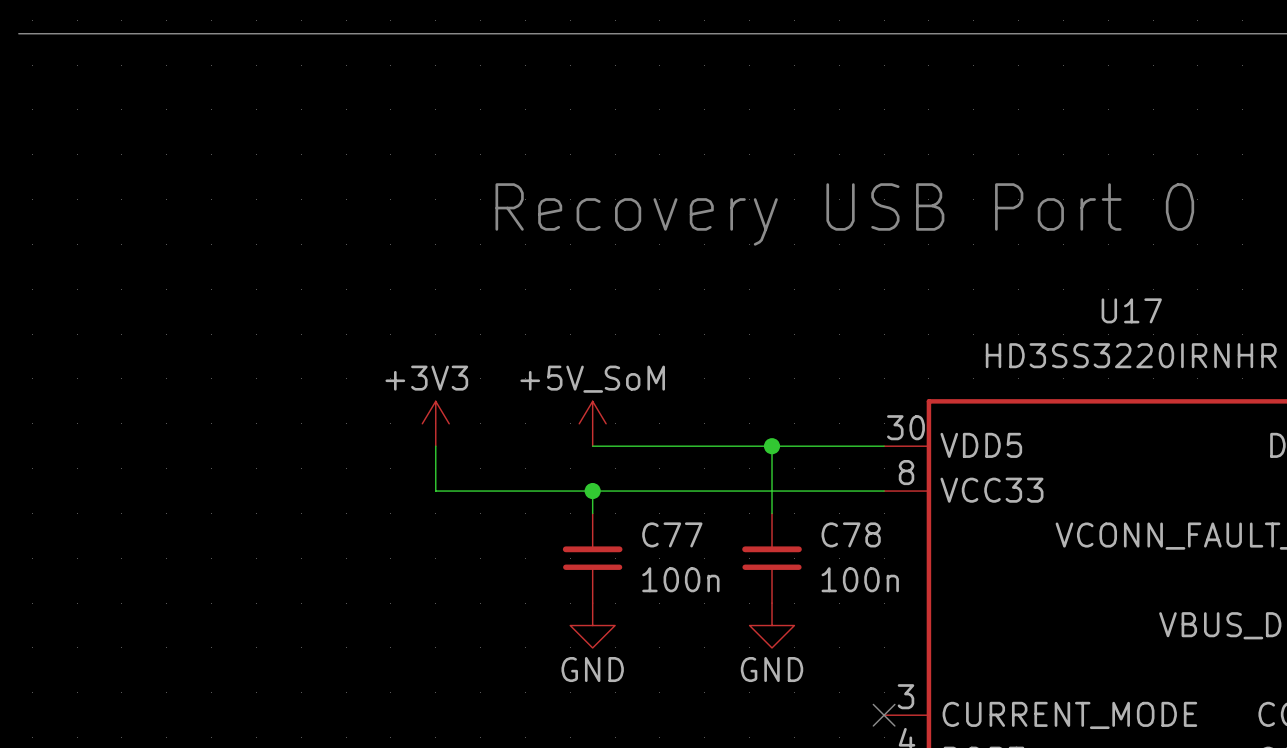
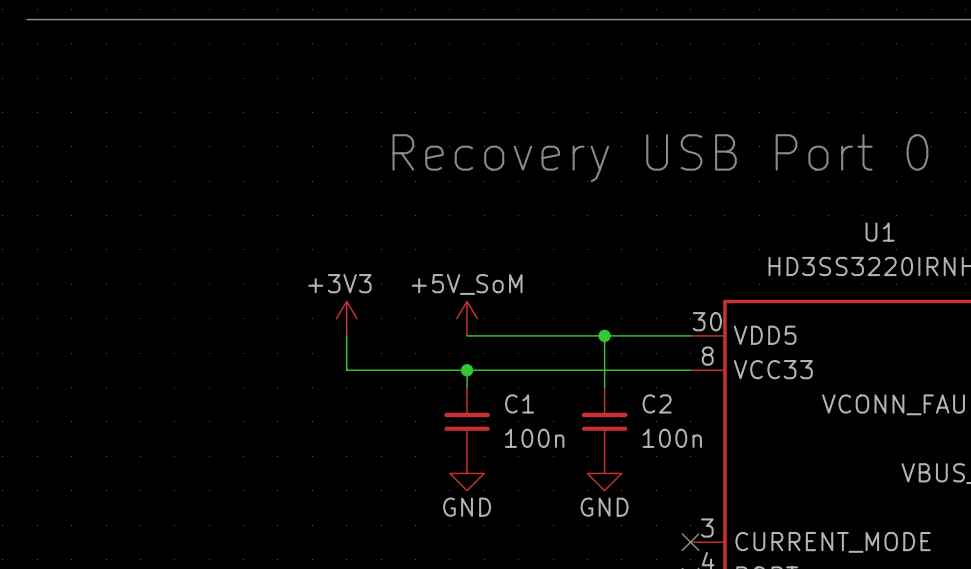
U17 name: U17 (1131, 310) -> U1 (880, 232)
C77 name: C77 (672, 534) -> C1 (519, 403)
C78 name: C78 (851, 534) -> C2 (657, 403)

